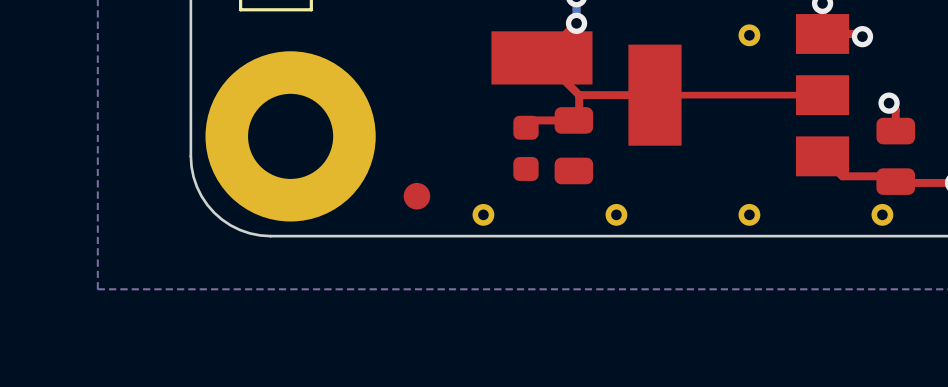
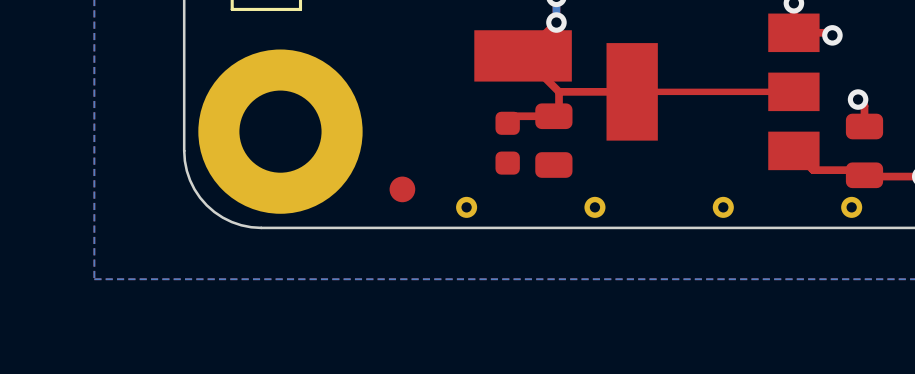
part: (749, 35) -> none

